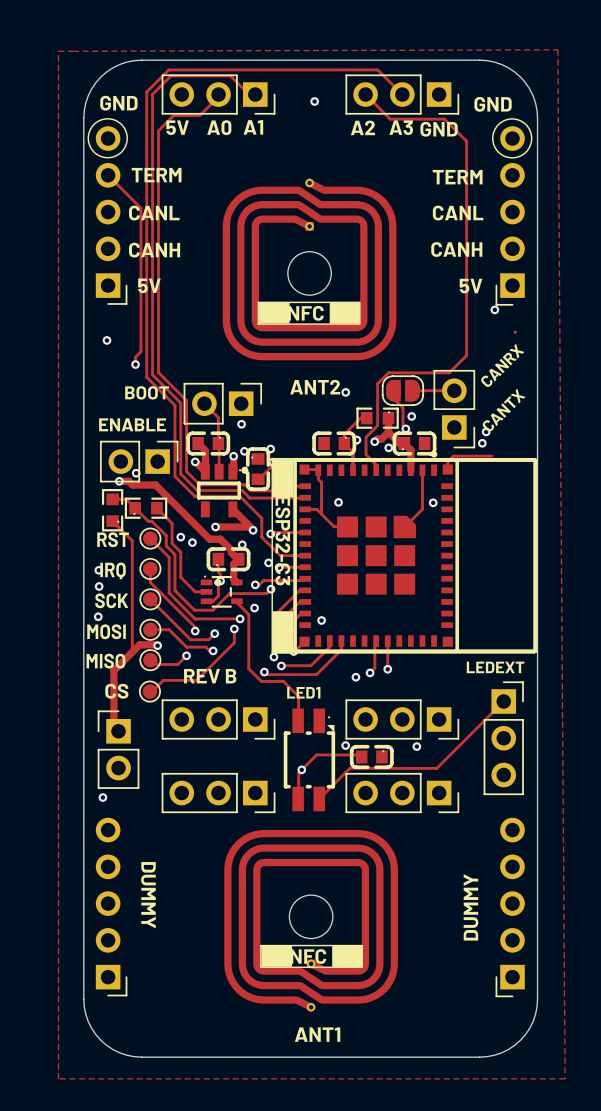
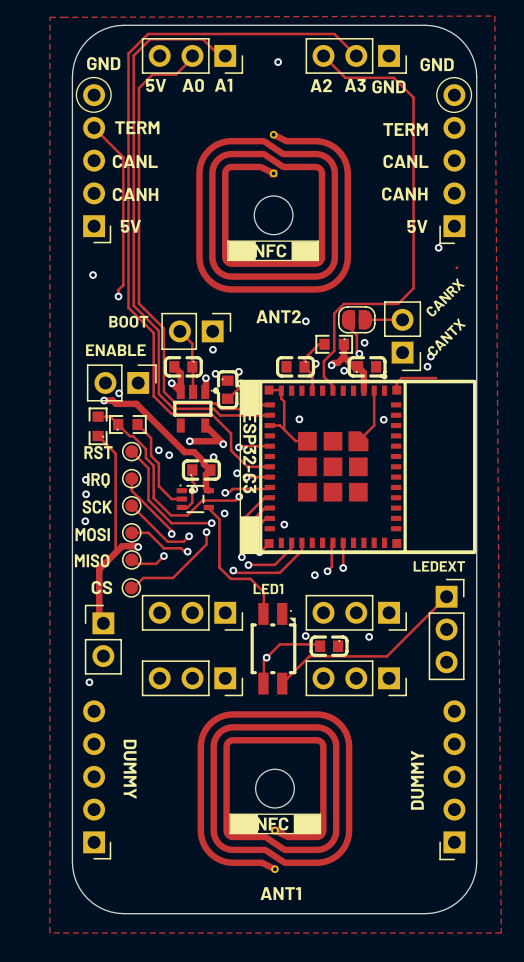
text: REV B (210, 676) -> none

